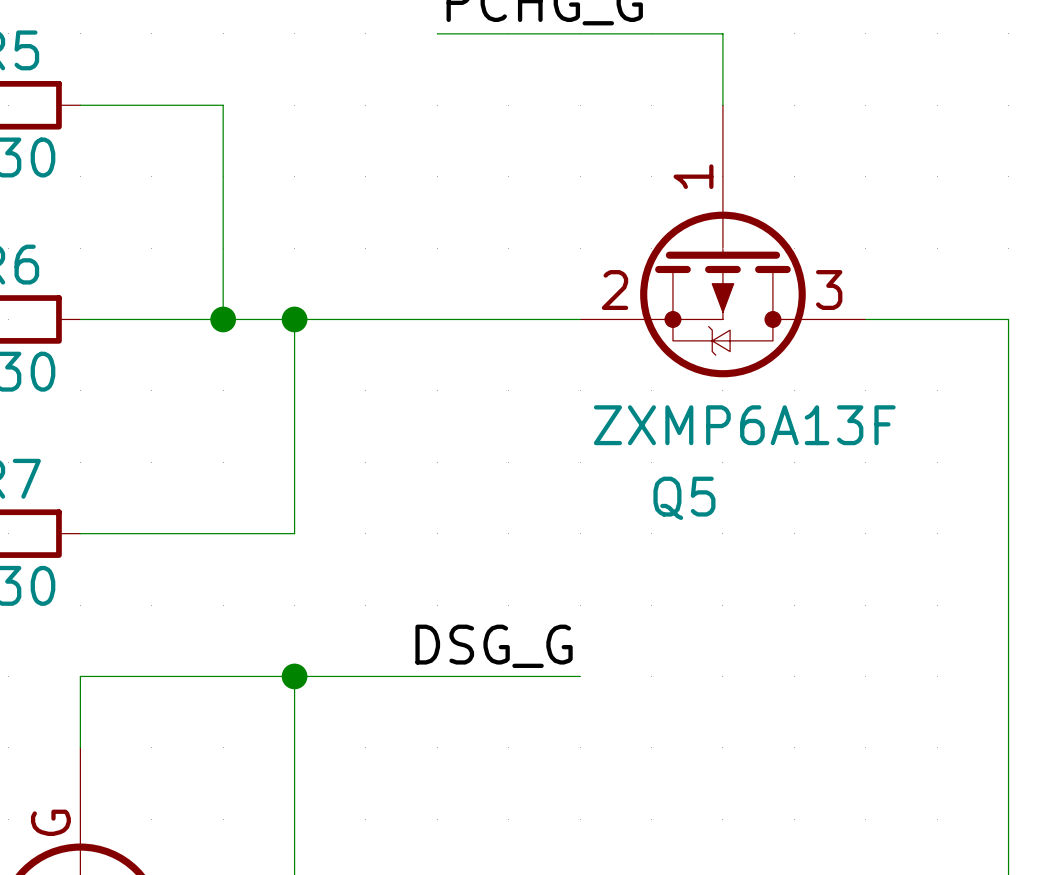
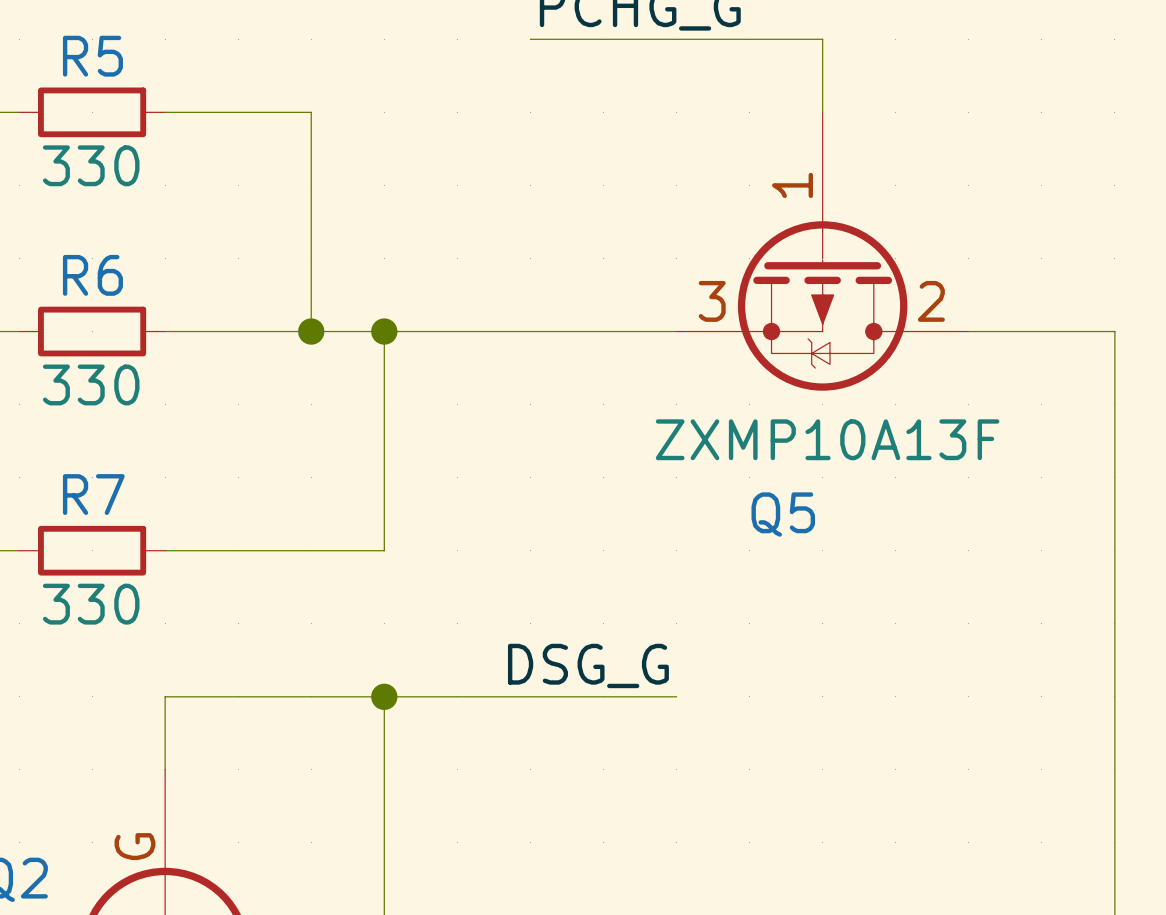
Q5 pin number: 2 (615, 290) -> 3 (712, 301)
Q5 pin number: 3 (829, 290) -> 2 (931, 301)
Q5 value: ZXMP6A13F (744, 425) -> ZXMP10A13F (827, 439)

